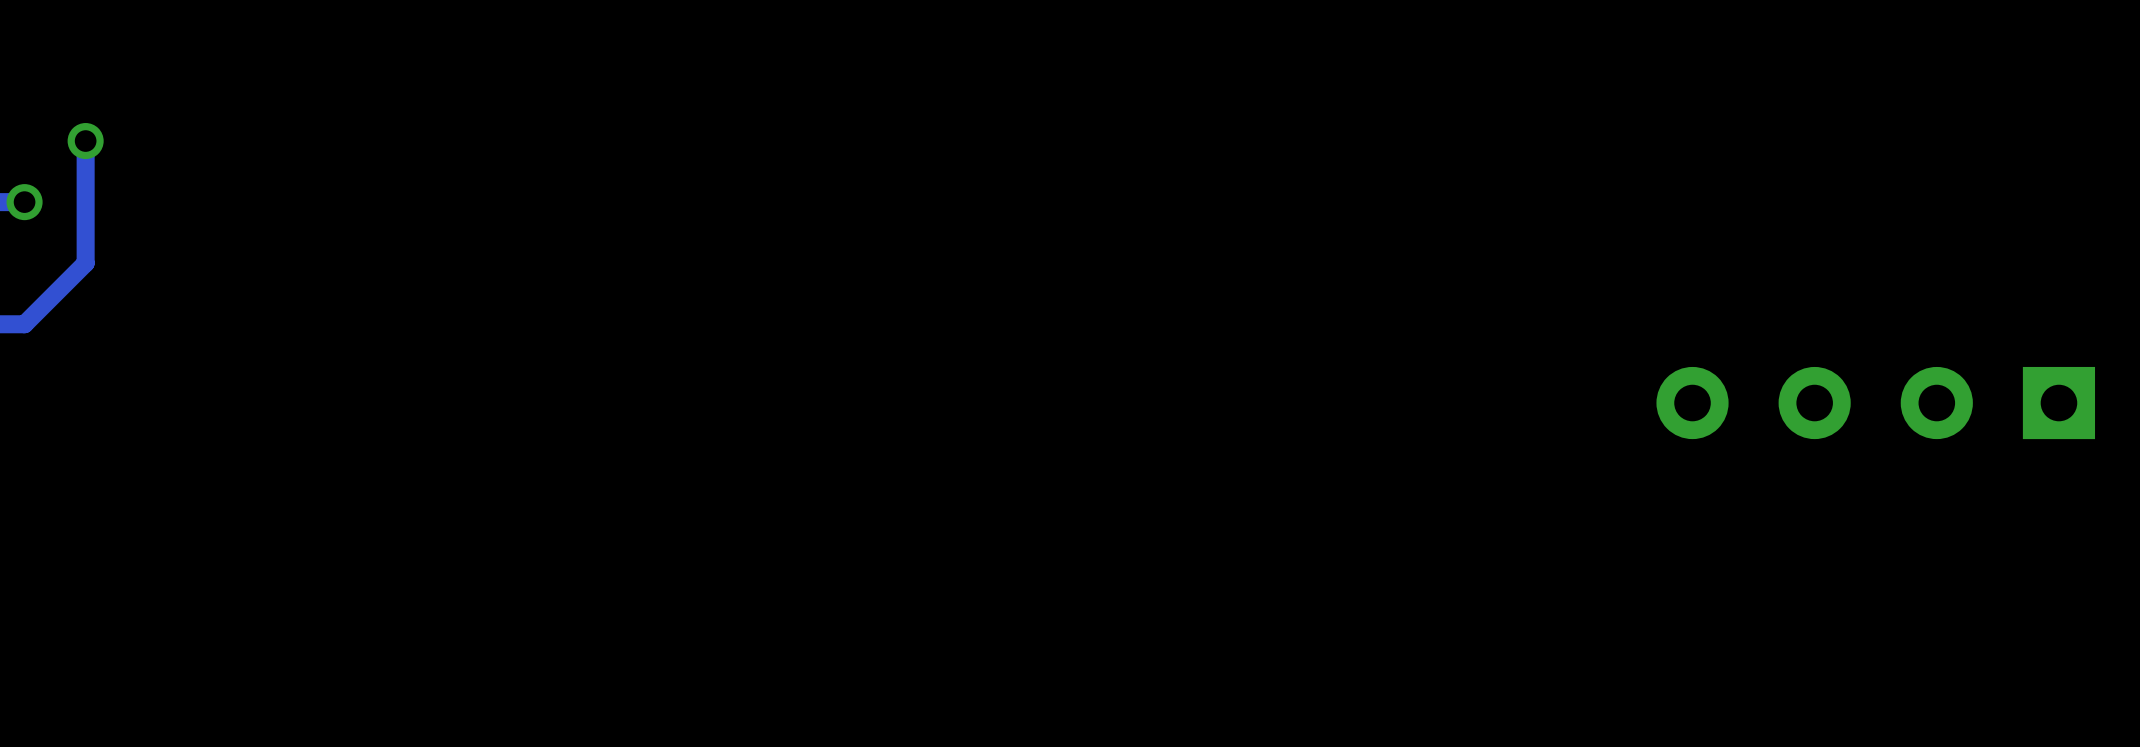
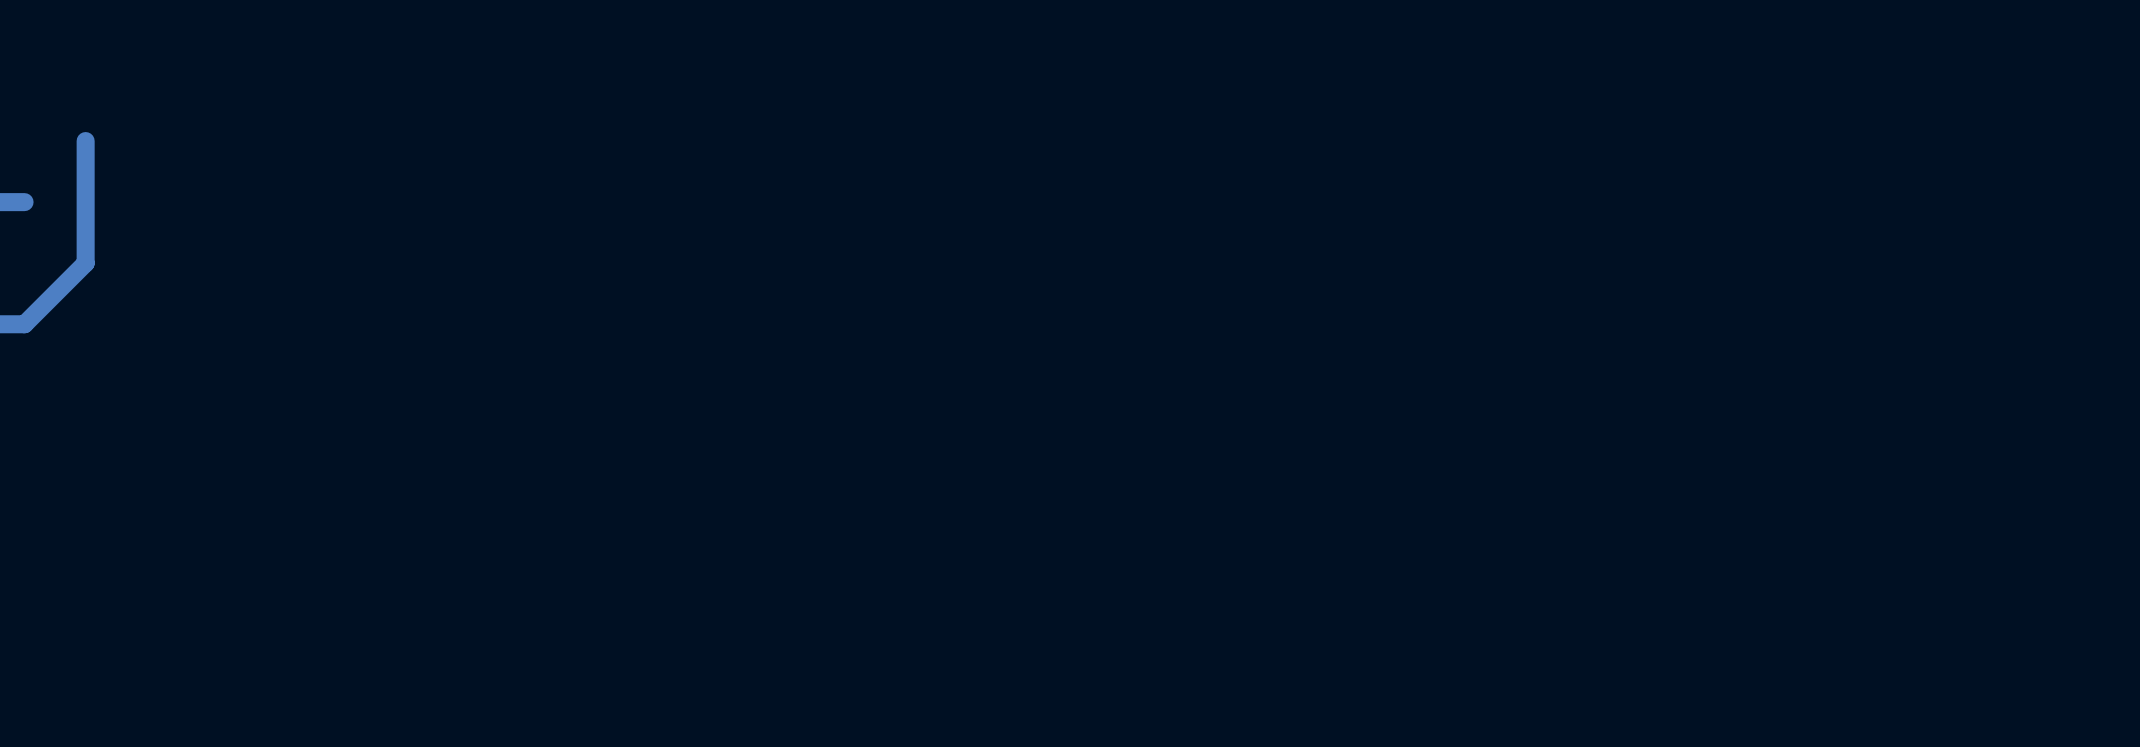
via: (85, 141) -> none
via: (24, 202) -> none
part: (1875, 403) -> none

